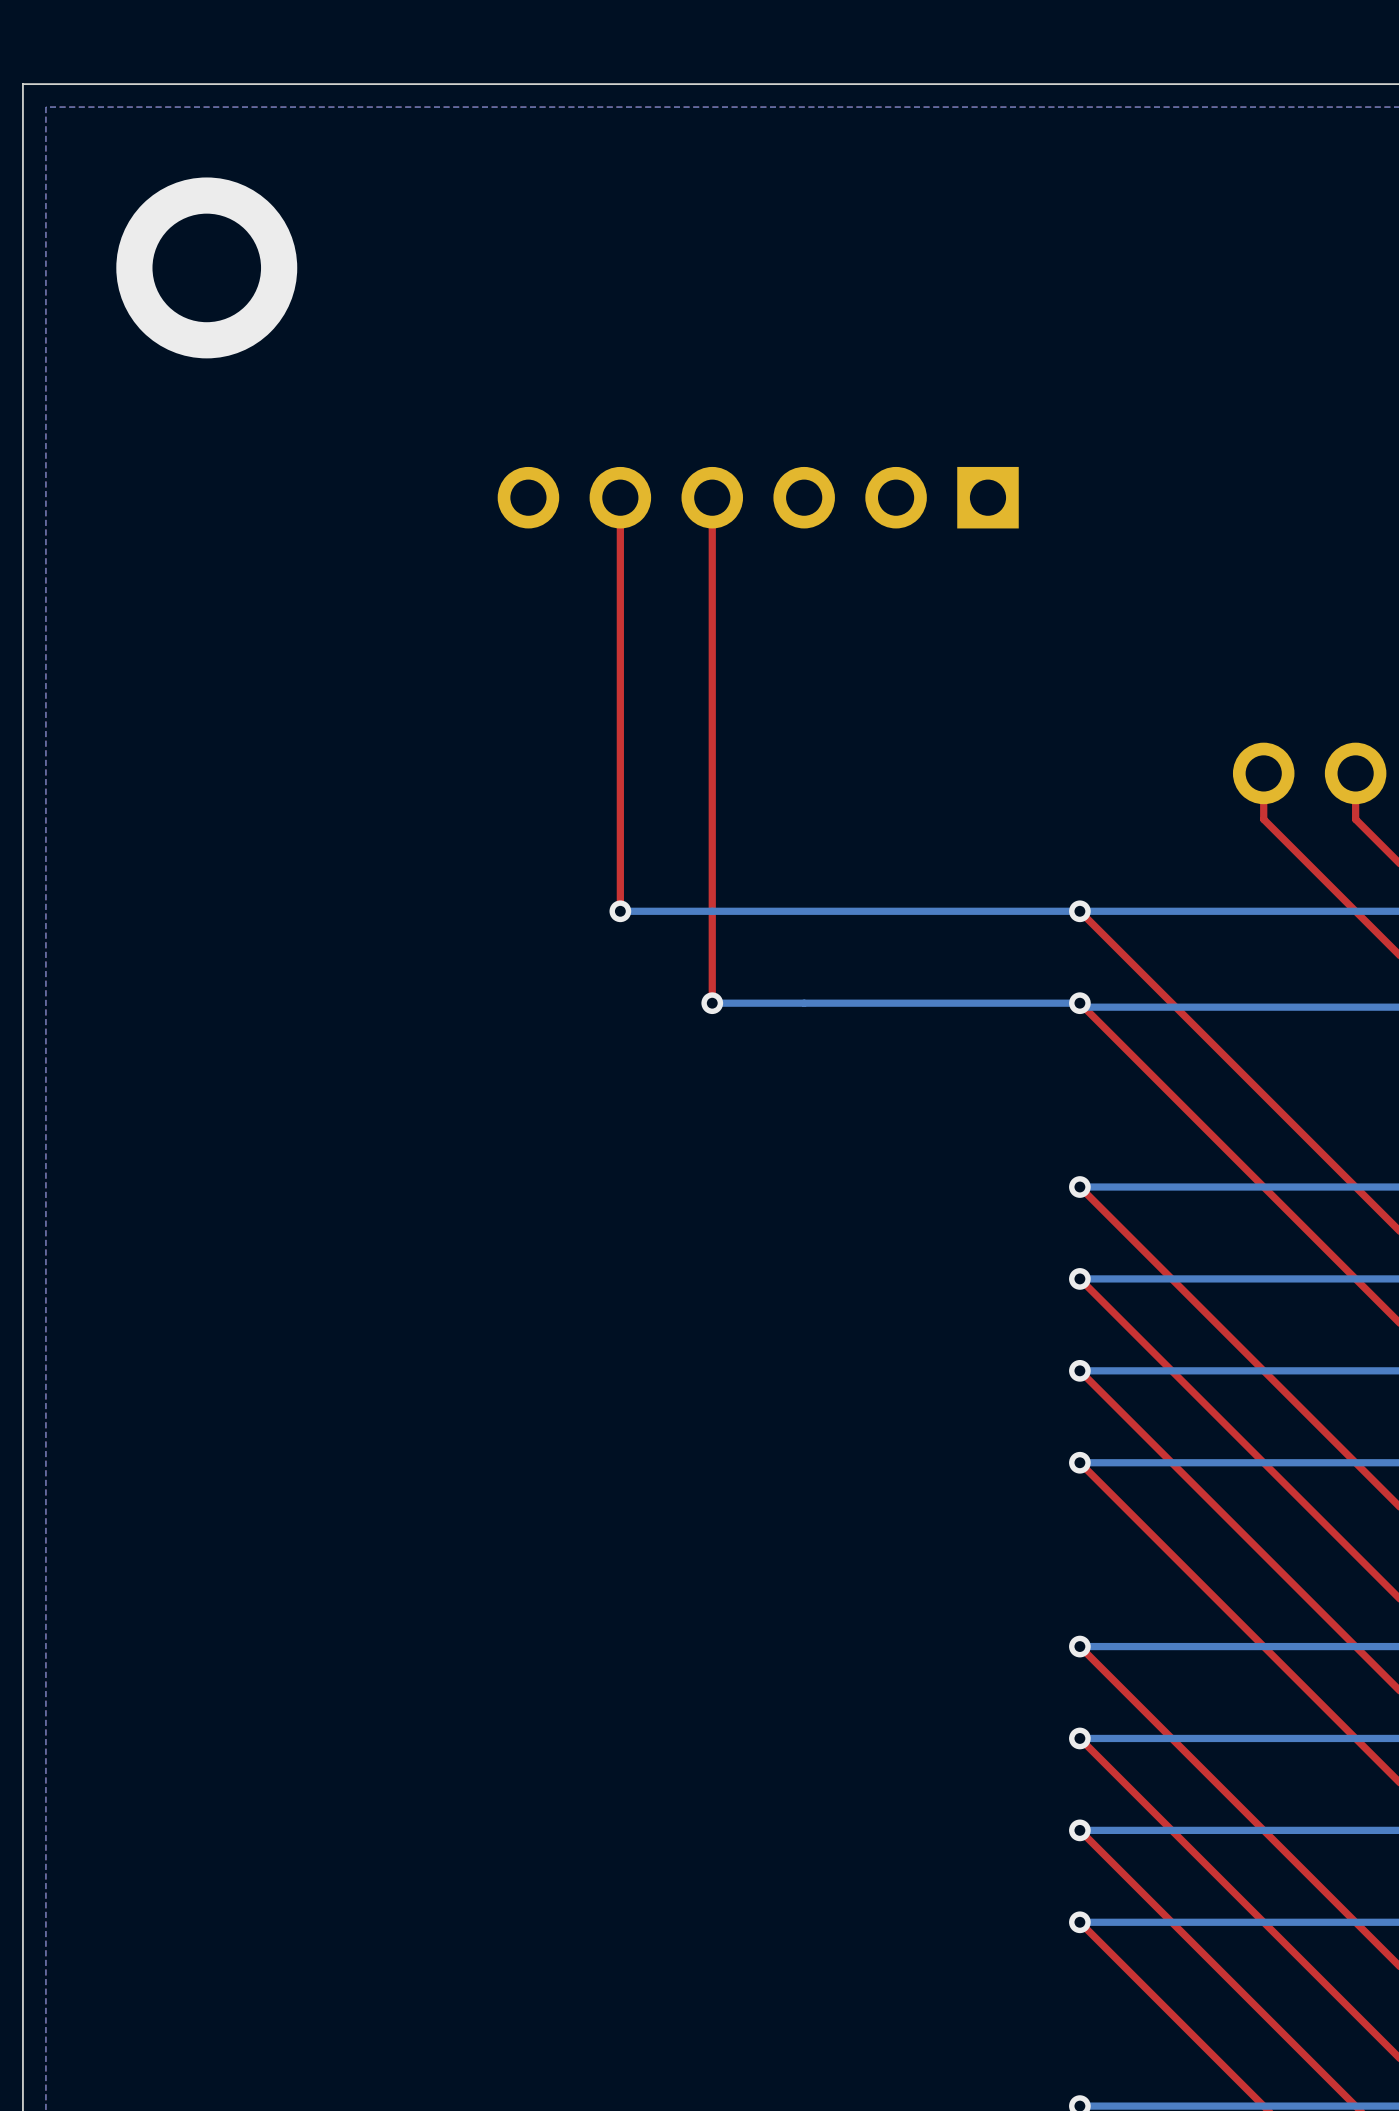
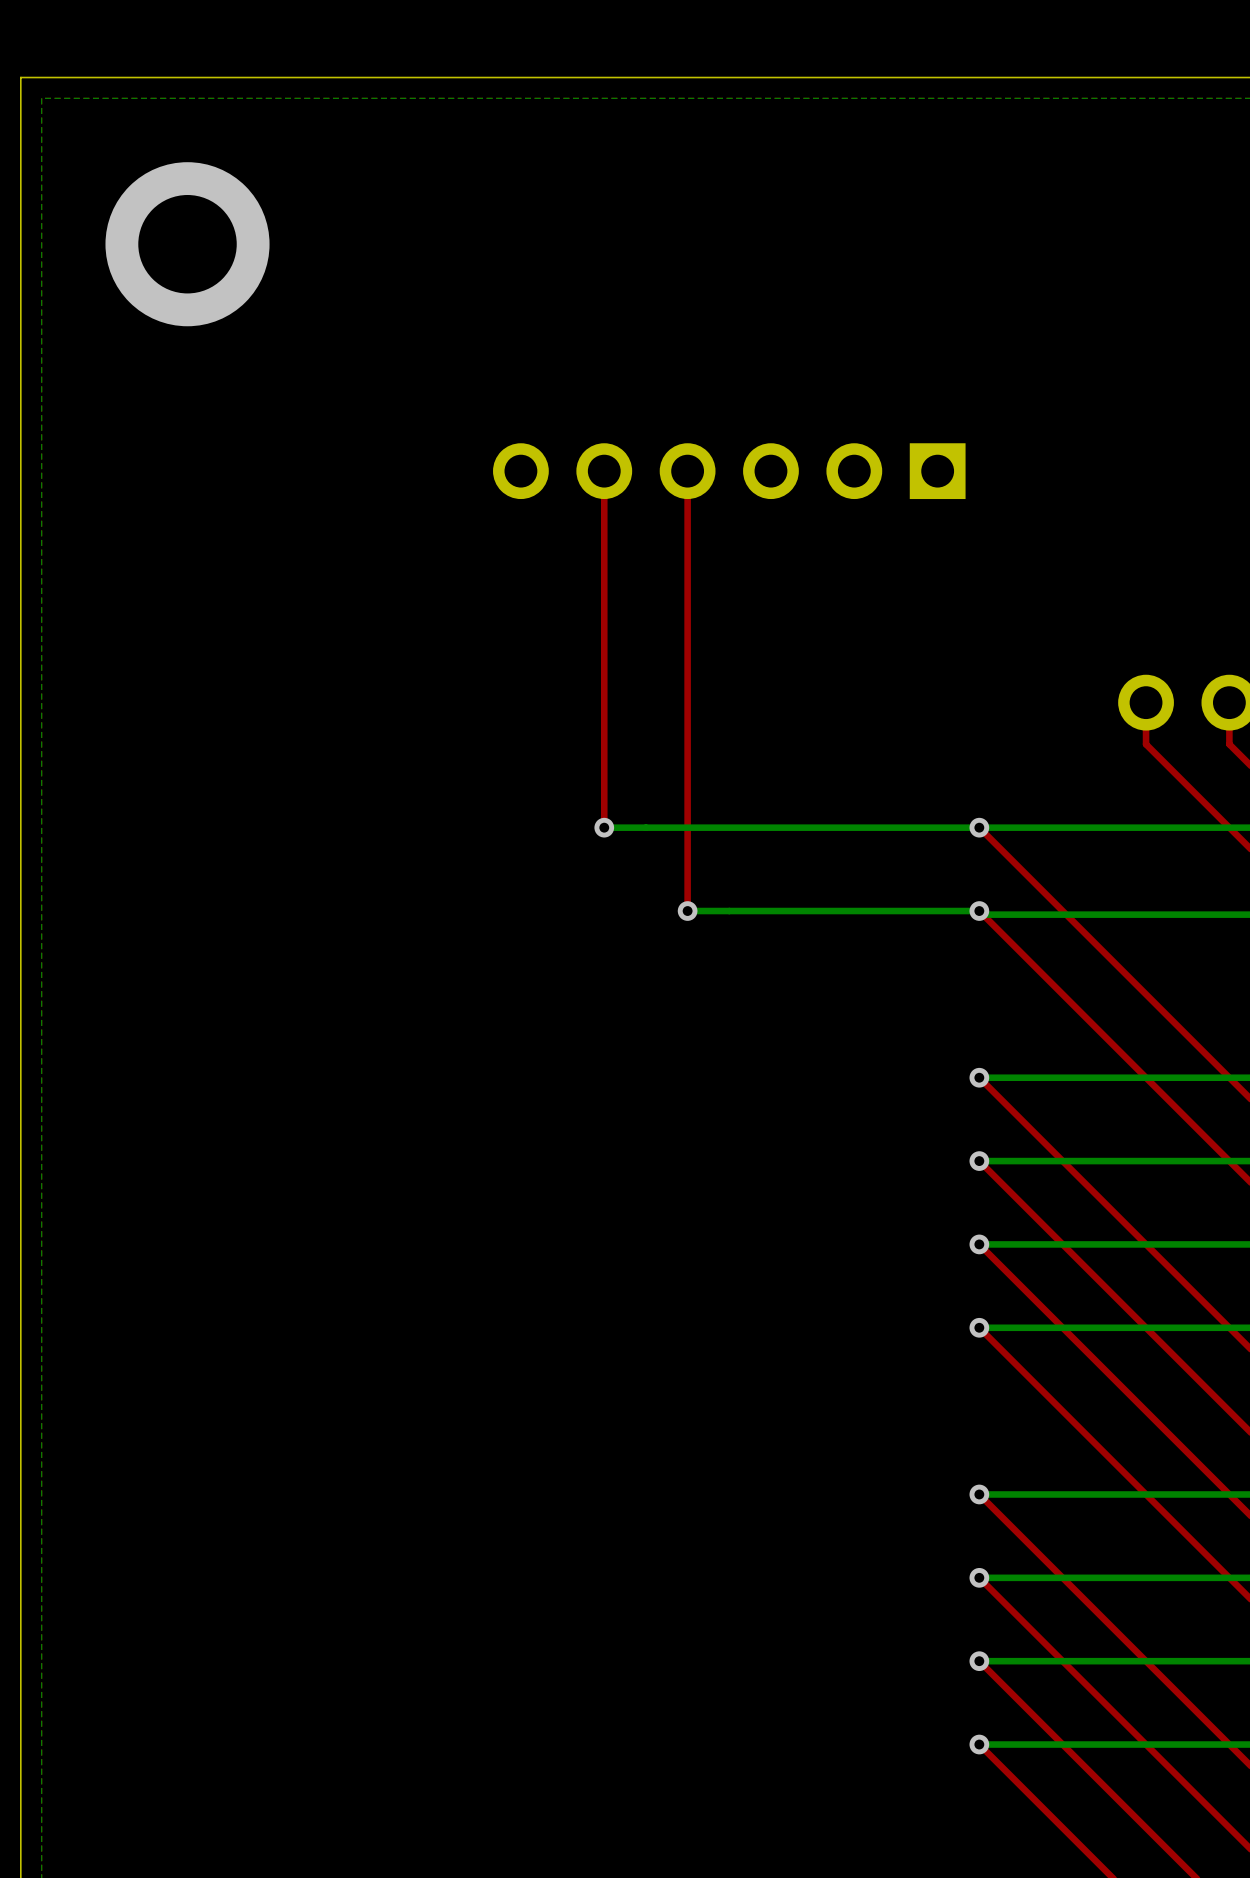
part position: (758, 497) -> (729, 471)
top track: (620, 518) (620, 911) -> (604, 471) (604, 827)
top track: (712, 518) (712, 1003) -> (687, 471) (687, 911)
via position: (620, 911) -> (604, 827)
bottom track: (666, 911) (620, 911) -> none
via position: (712, 1003) -> (687, 911)
bottom track: (758, 1003) (712, 1003) -> none

